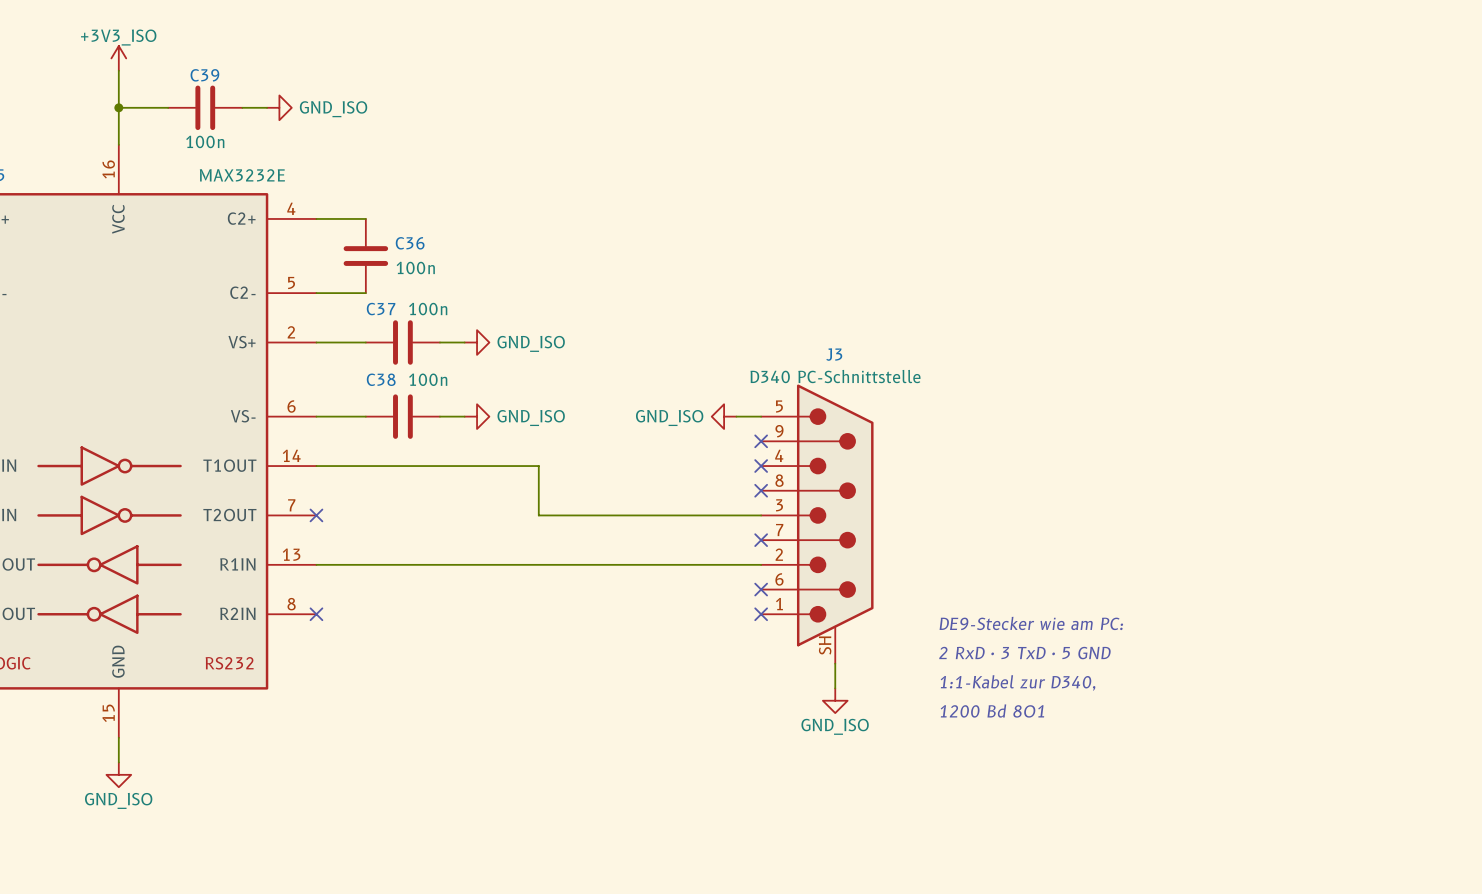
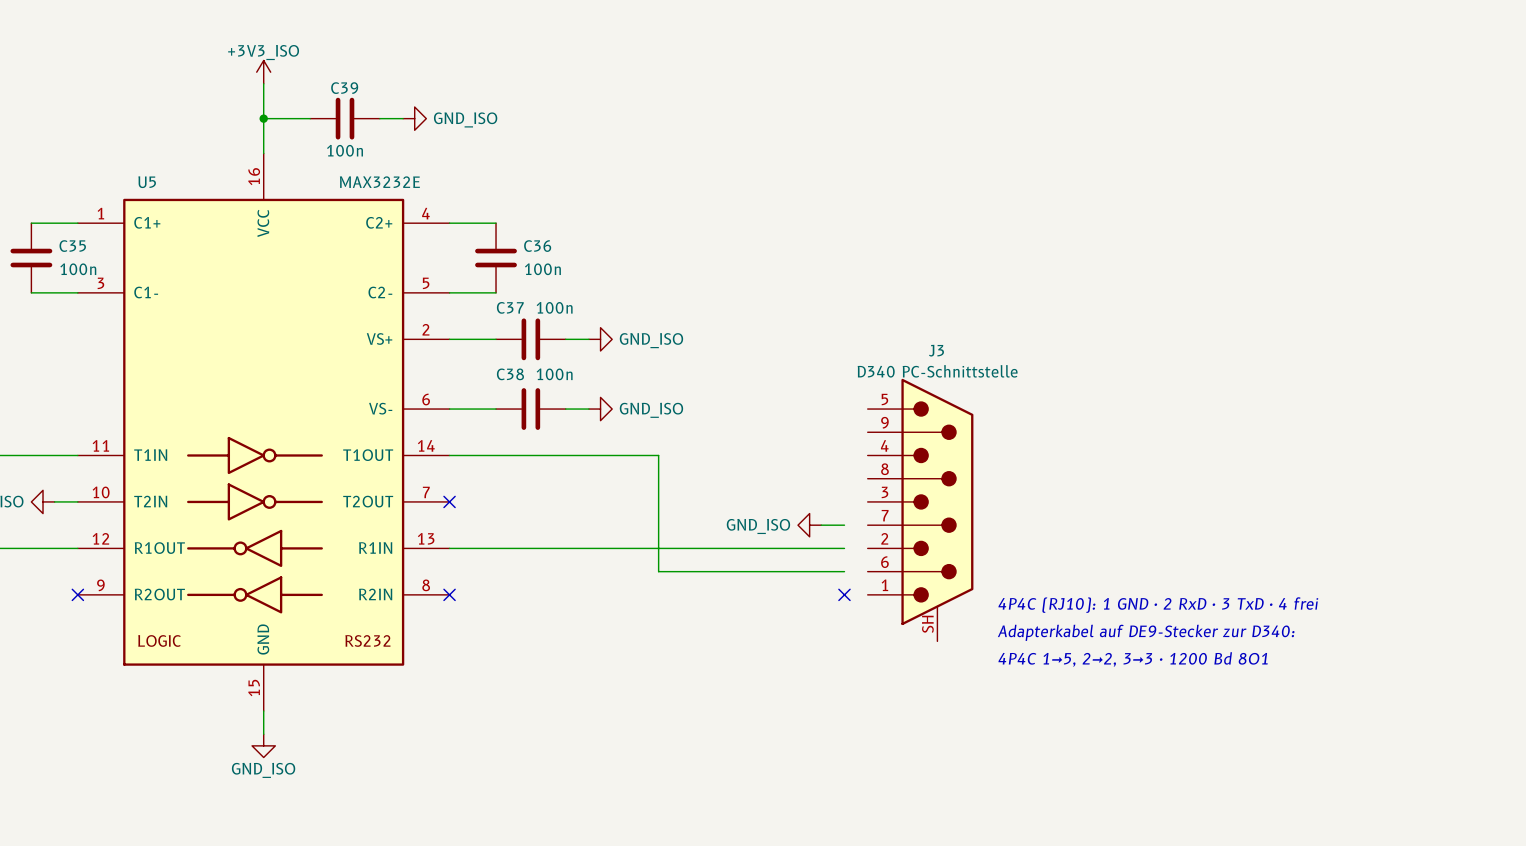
power symbol: GND_ISO (724, 416) -> none
wire: (736, 416) (761, 416) -> none
no-connect mark: (761, 441) -> none
no-connect mark: (761, 466) -> none
no-connect mark: (761, 490) -> none
wire: (538, 515) (761, 515) -> (658, 501) (658, 571) (844, 571)
power symbol: none -> GND_ISO (809, 525)
no-connect mark: (761, 540) -> none
wire: (736, 564) (761, 564) -> (821, 525) (844, 525)
no-connect mark: (761, 589) -> none
no-connect mark: none -> (844, 594)
no-connect mark: (761, 614) -> none
text: DE9-Stecker wie am PC: (1031, 623) -> none
text: none -> 4P4C (RJ10): 1 GND · 2 RxD · 3 TxD · 4 frei (1158, 605)
text: 2 RxD · 3 TxD · 5 GND (1024, 653) -> none
text: none -> Adapterkabel auf DE9-Stecker zur D340: (1146, 632)
wire: (835, 663) (835, 688) -> none
text: 1:1-Kabel zur D340, (1018, 682) -> none
text: none -> 4P4C 1→5, 2→2, 3→3 · 1200 Bd 8O1 (1133, 659)
power symbol: GND_ISO (835, 700) -> none
text: 1200 Bd 8O1 (992, 710) -> none

